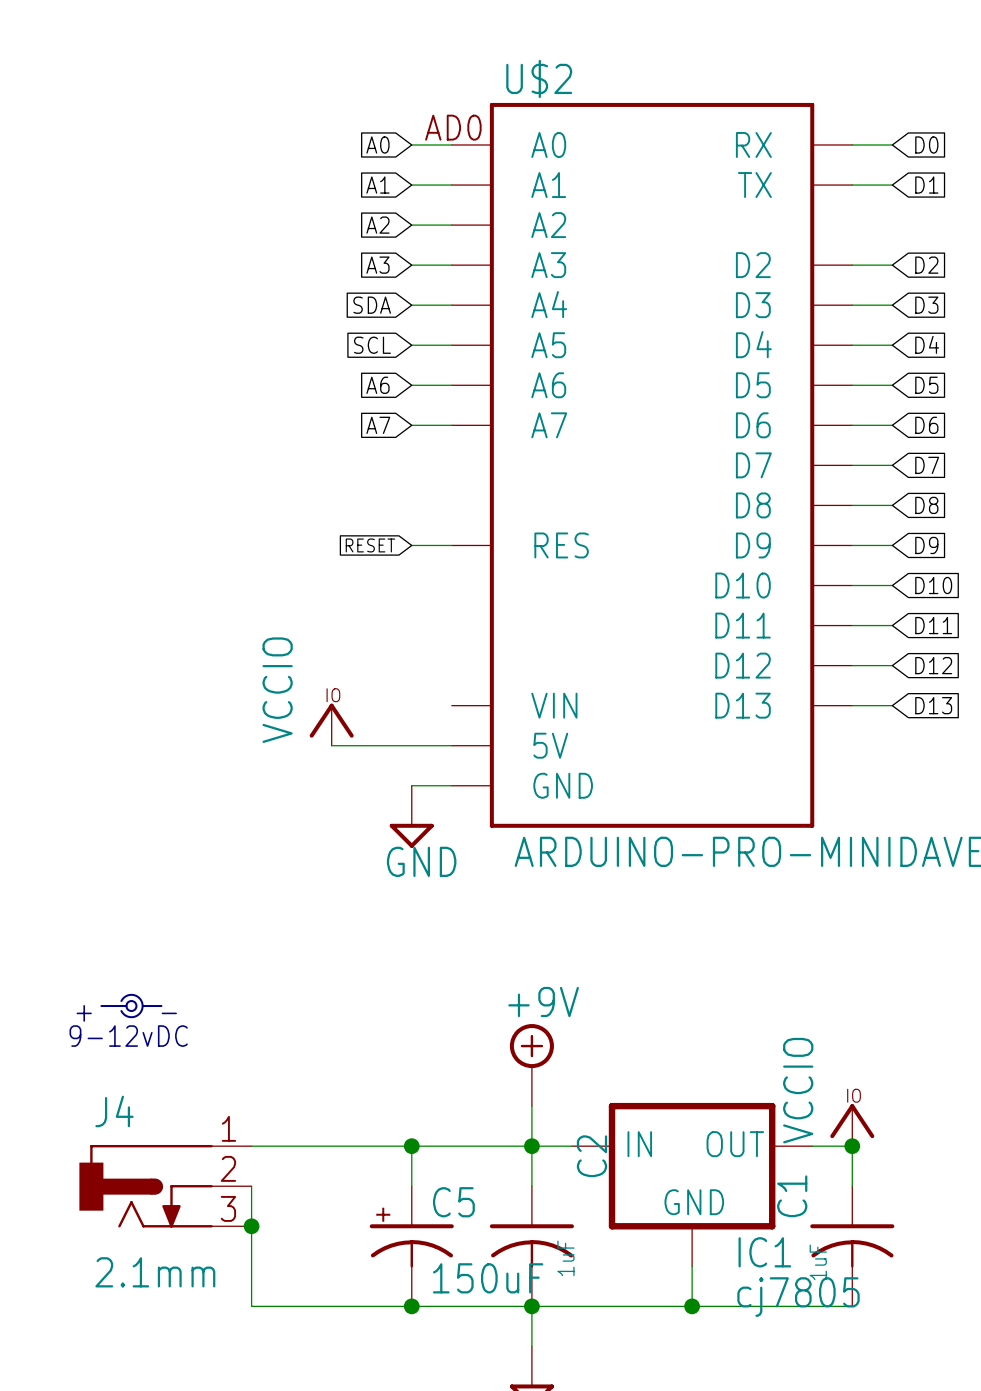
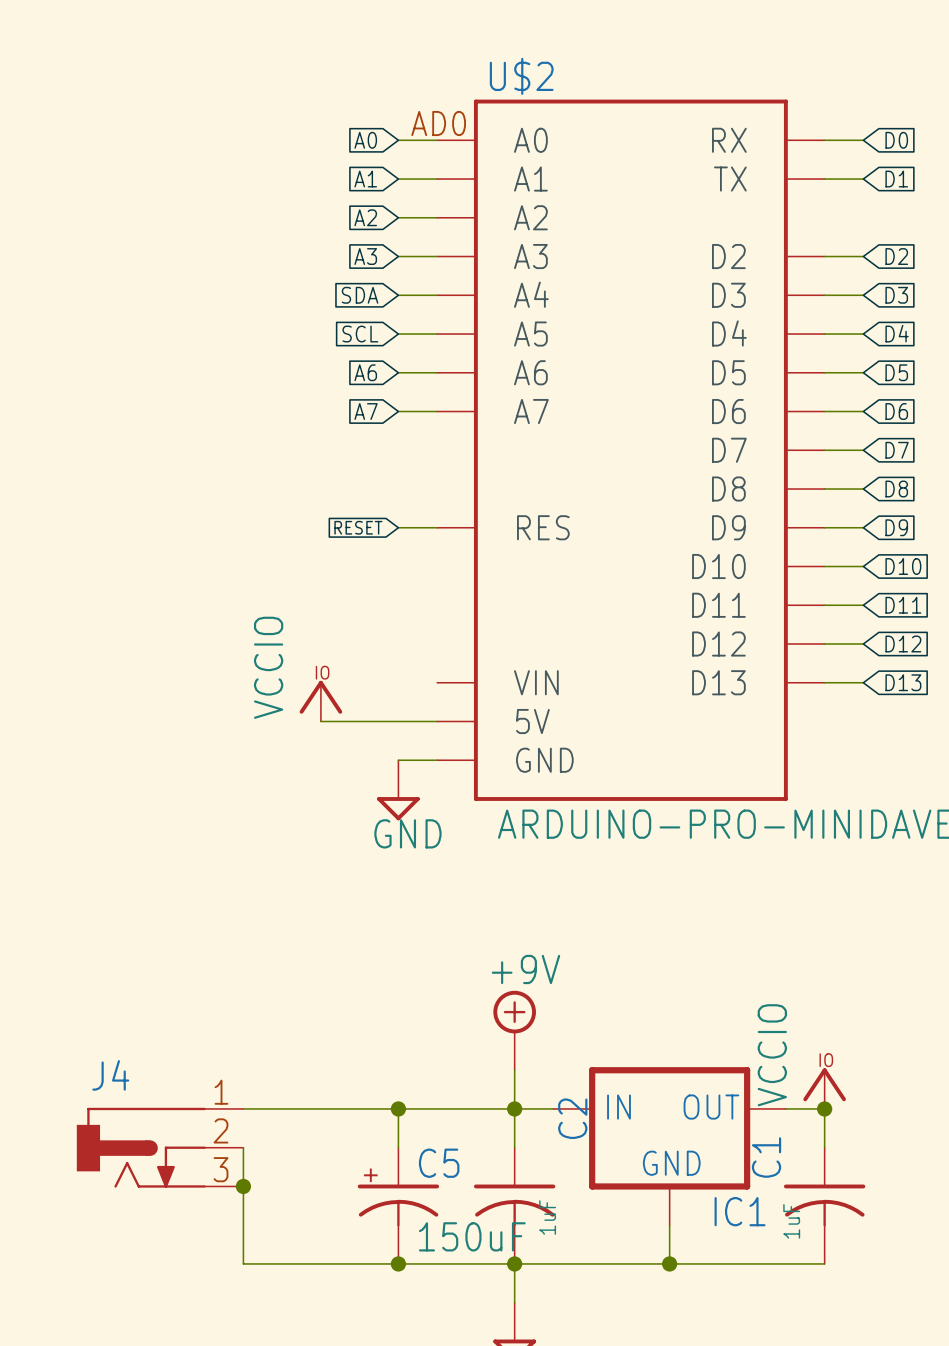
part: 9-12vDC (131, 1006) -> none
J4 value: 2.1mm (155, 1272) -> none
IC1 value: cj7805 (798, 1297) -> none

